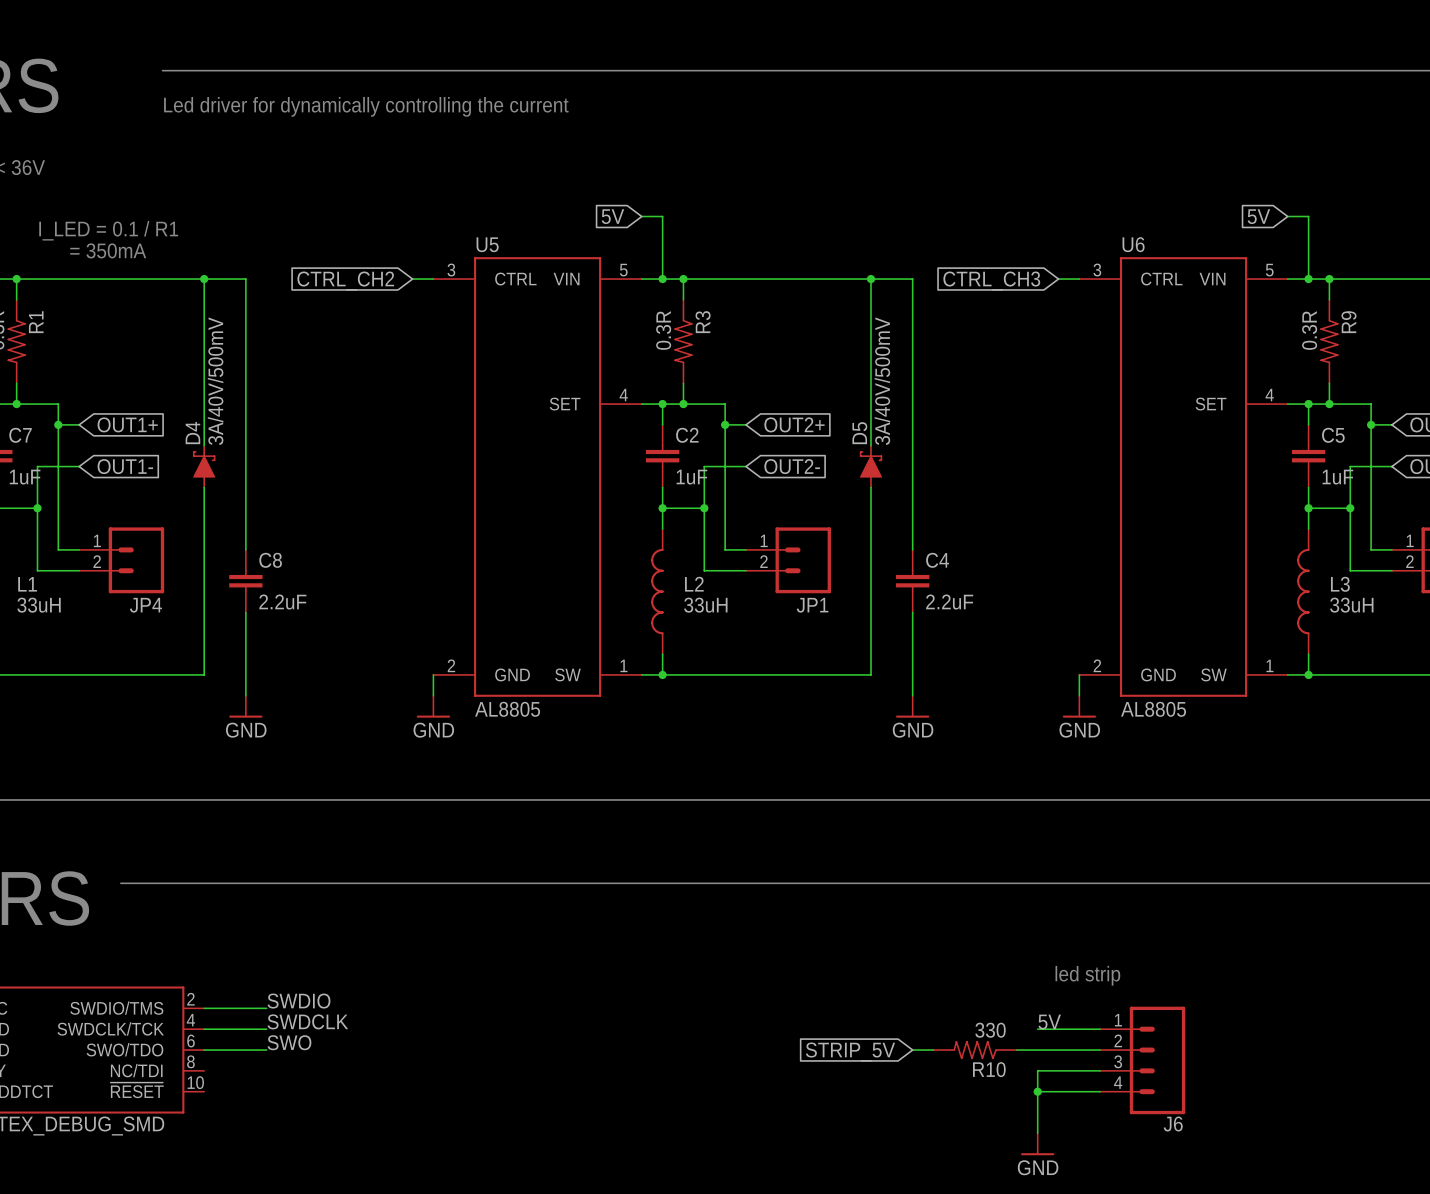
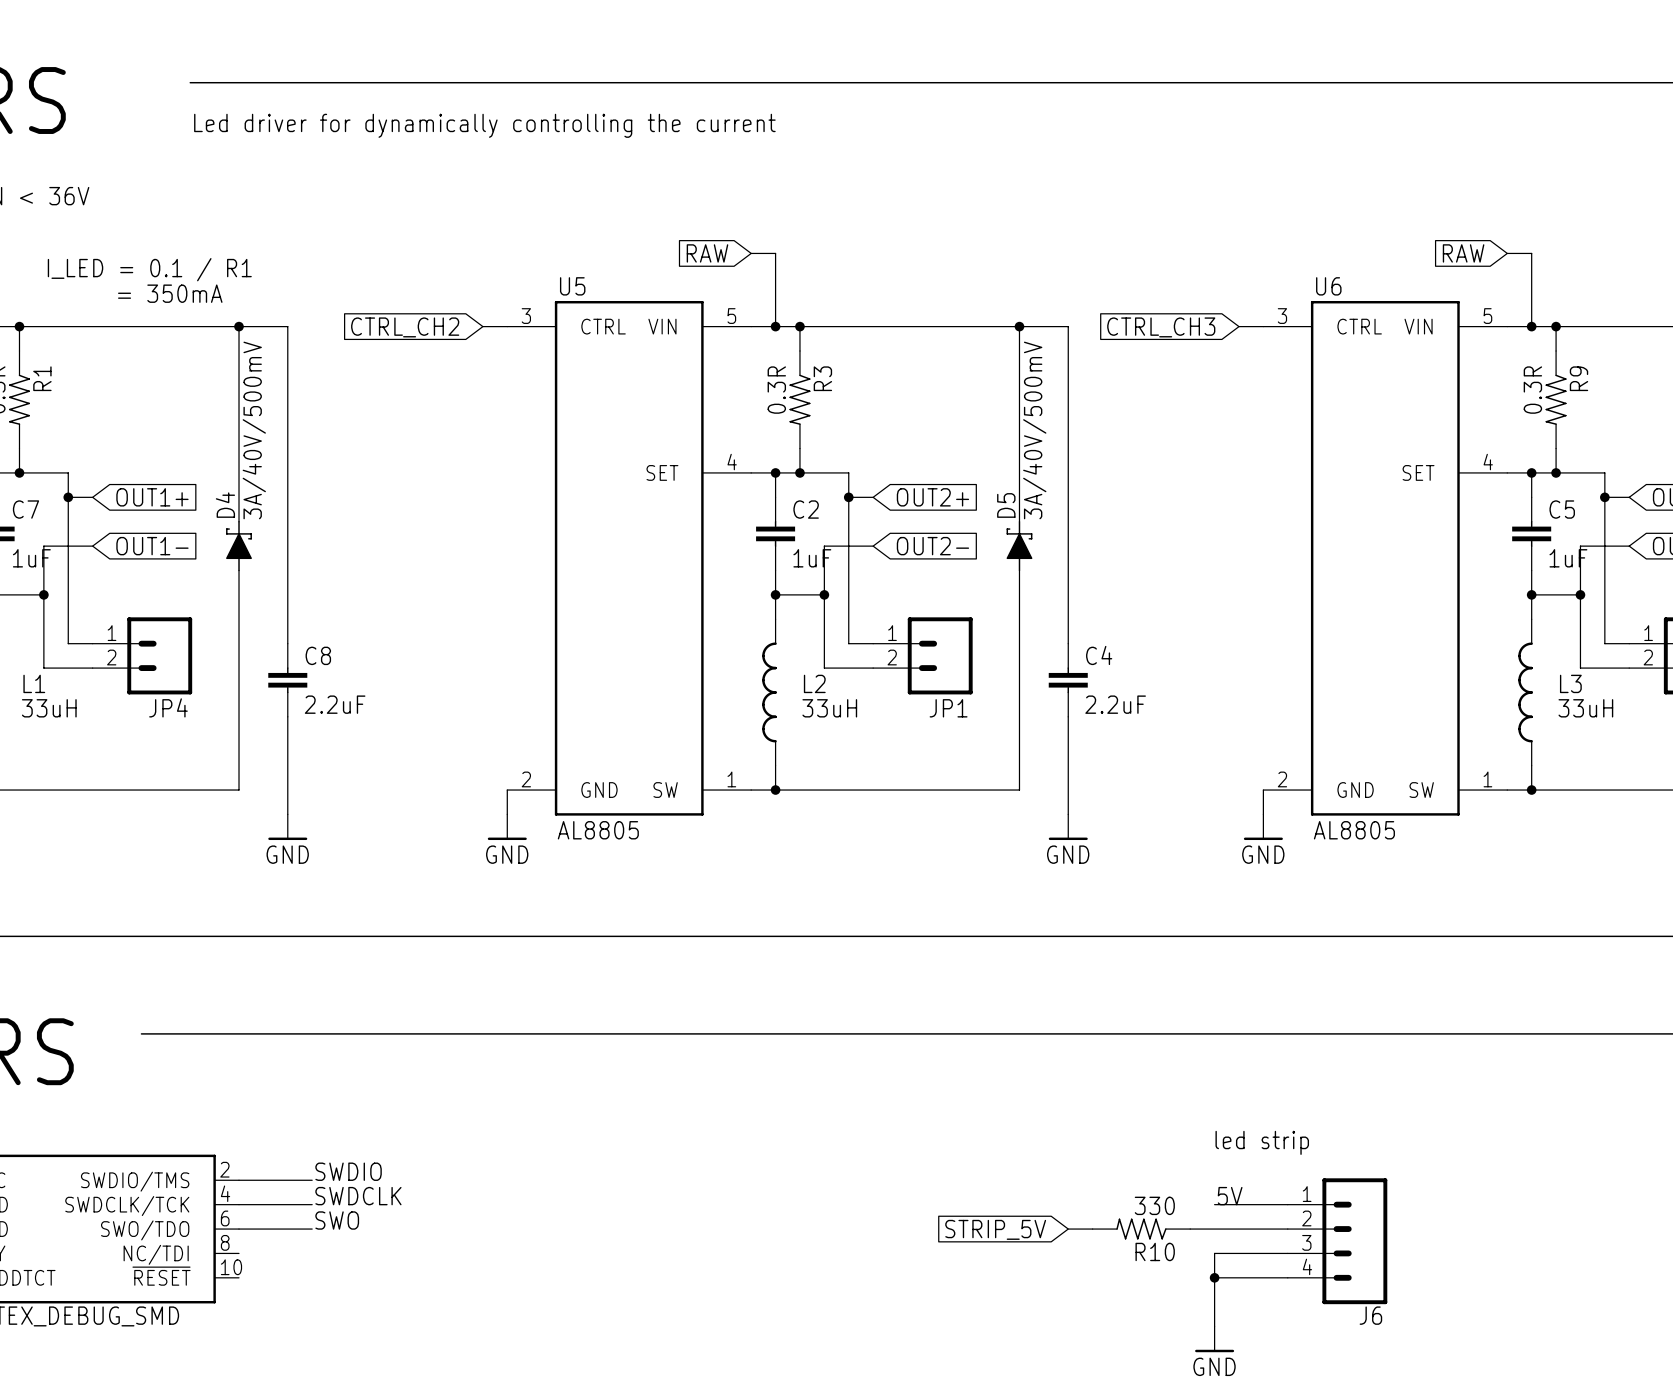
global label: 5V (612, 216) -> RAW (707, 253)
global label: 5V (1258, 216) -> RAW (1463, 253)

